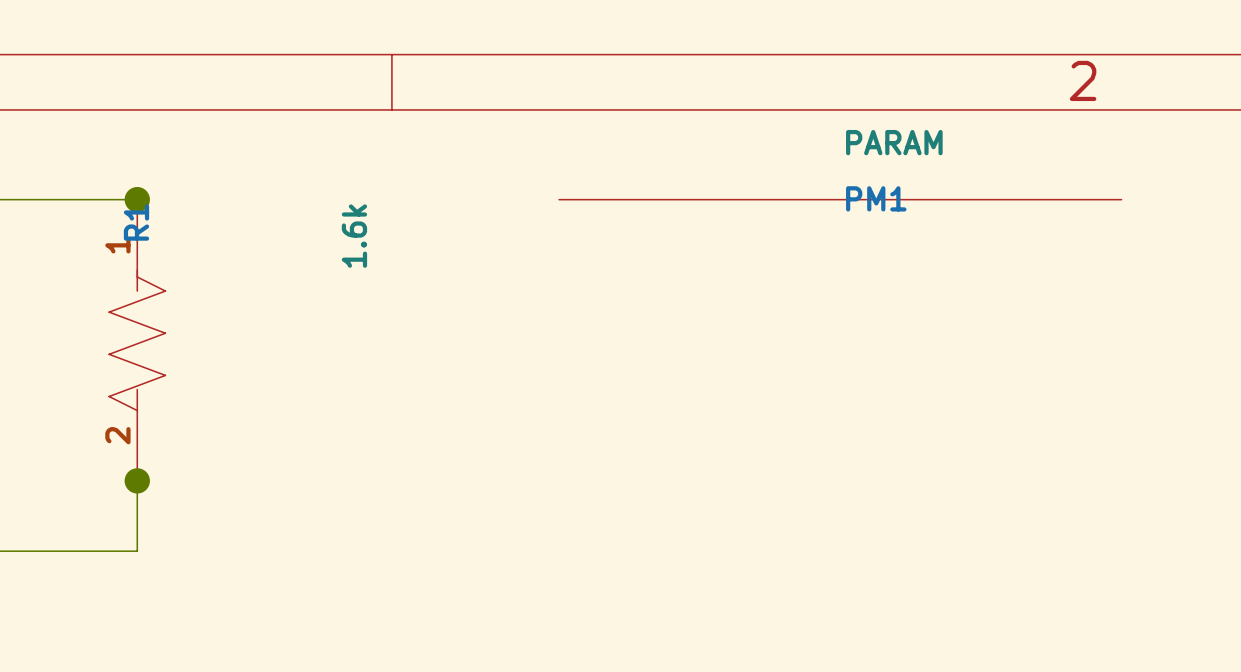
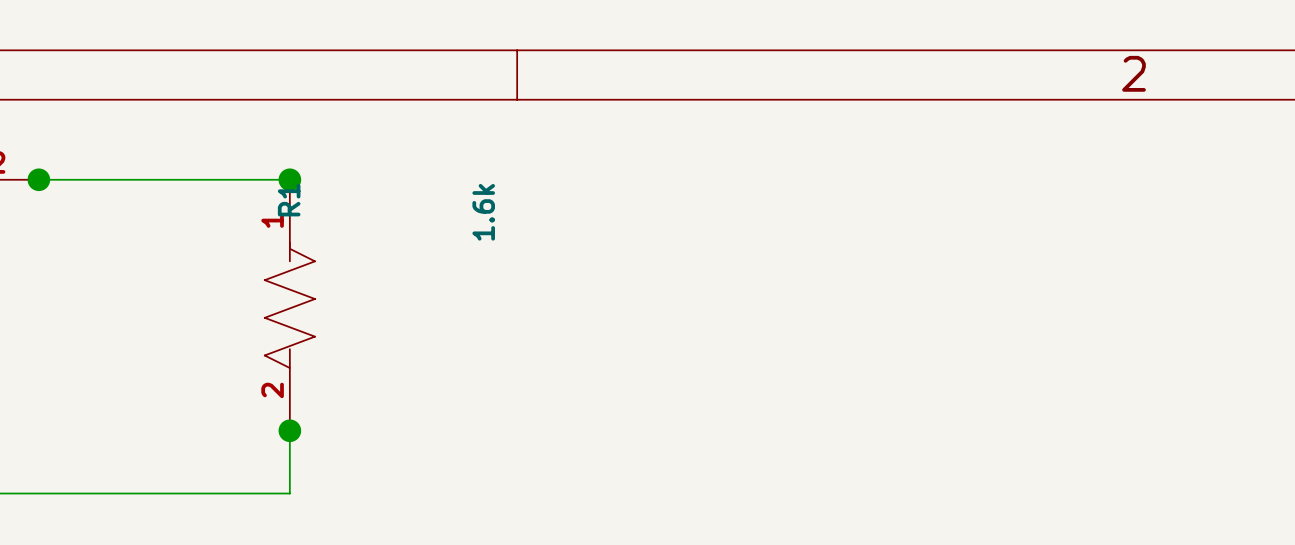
PM1: PARAM (840, 199) -> none

